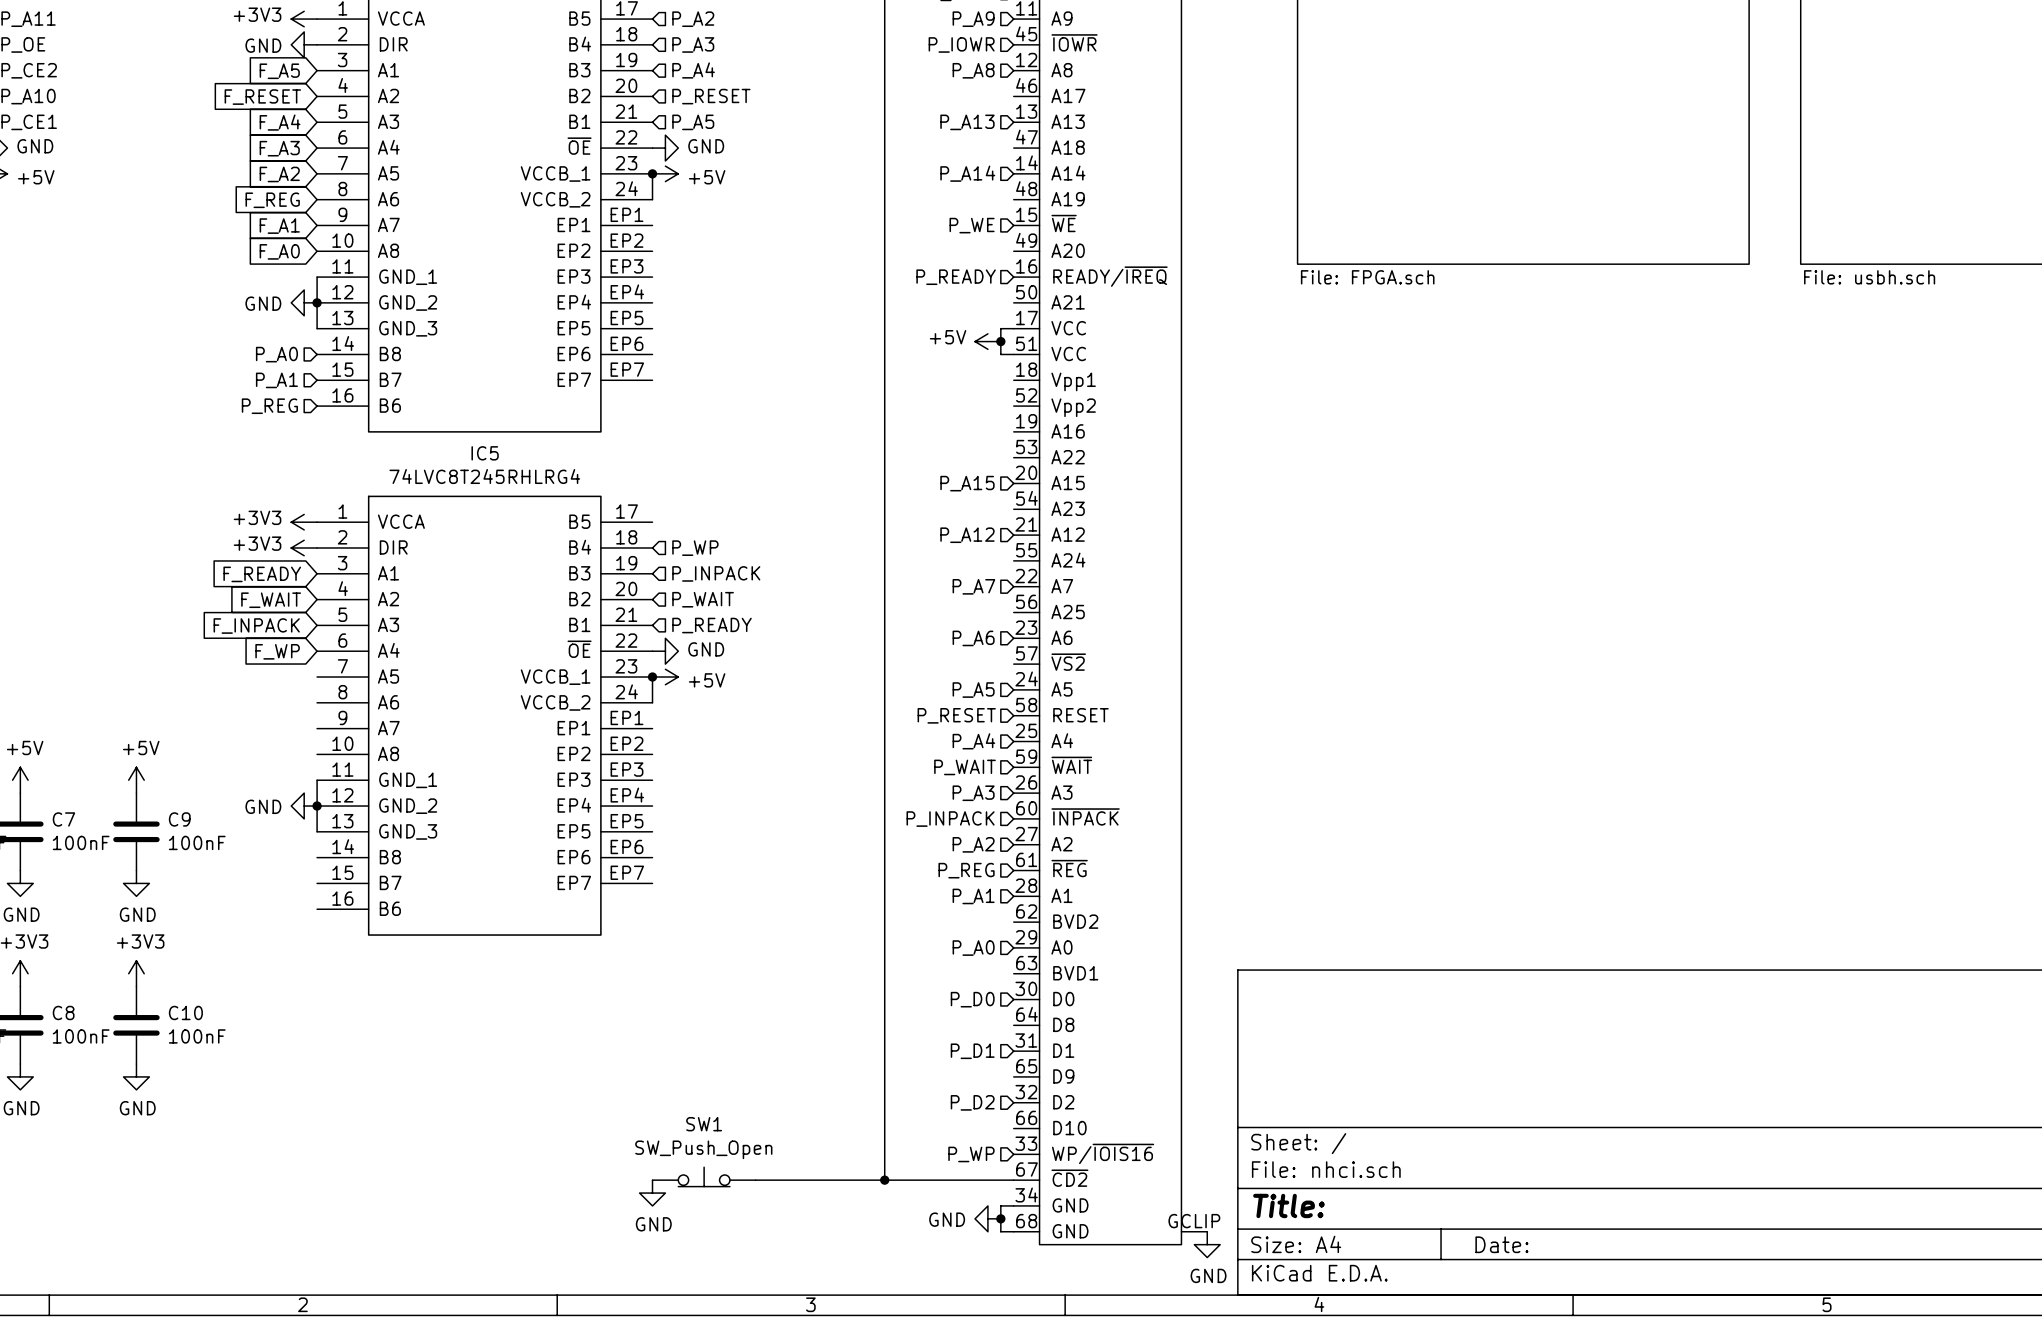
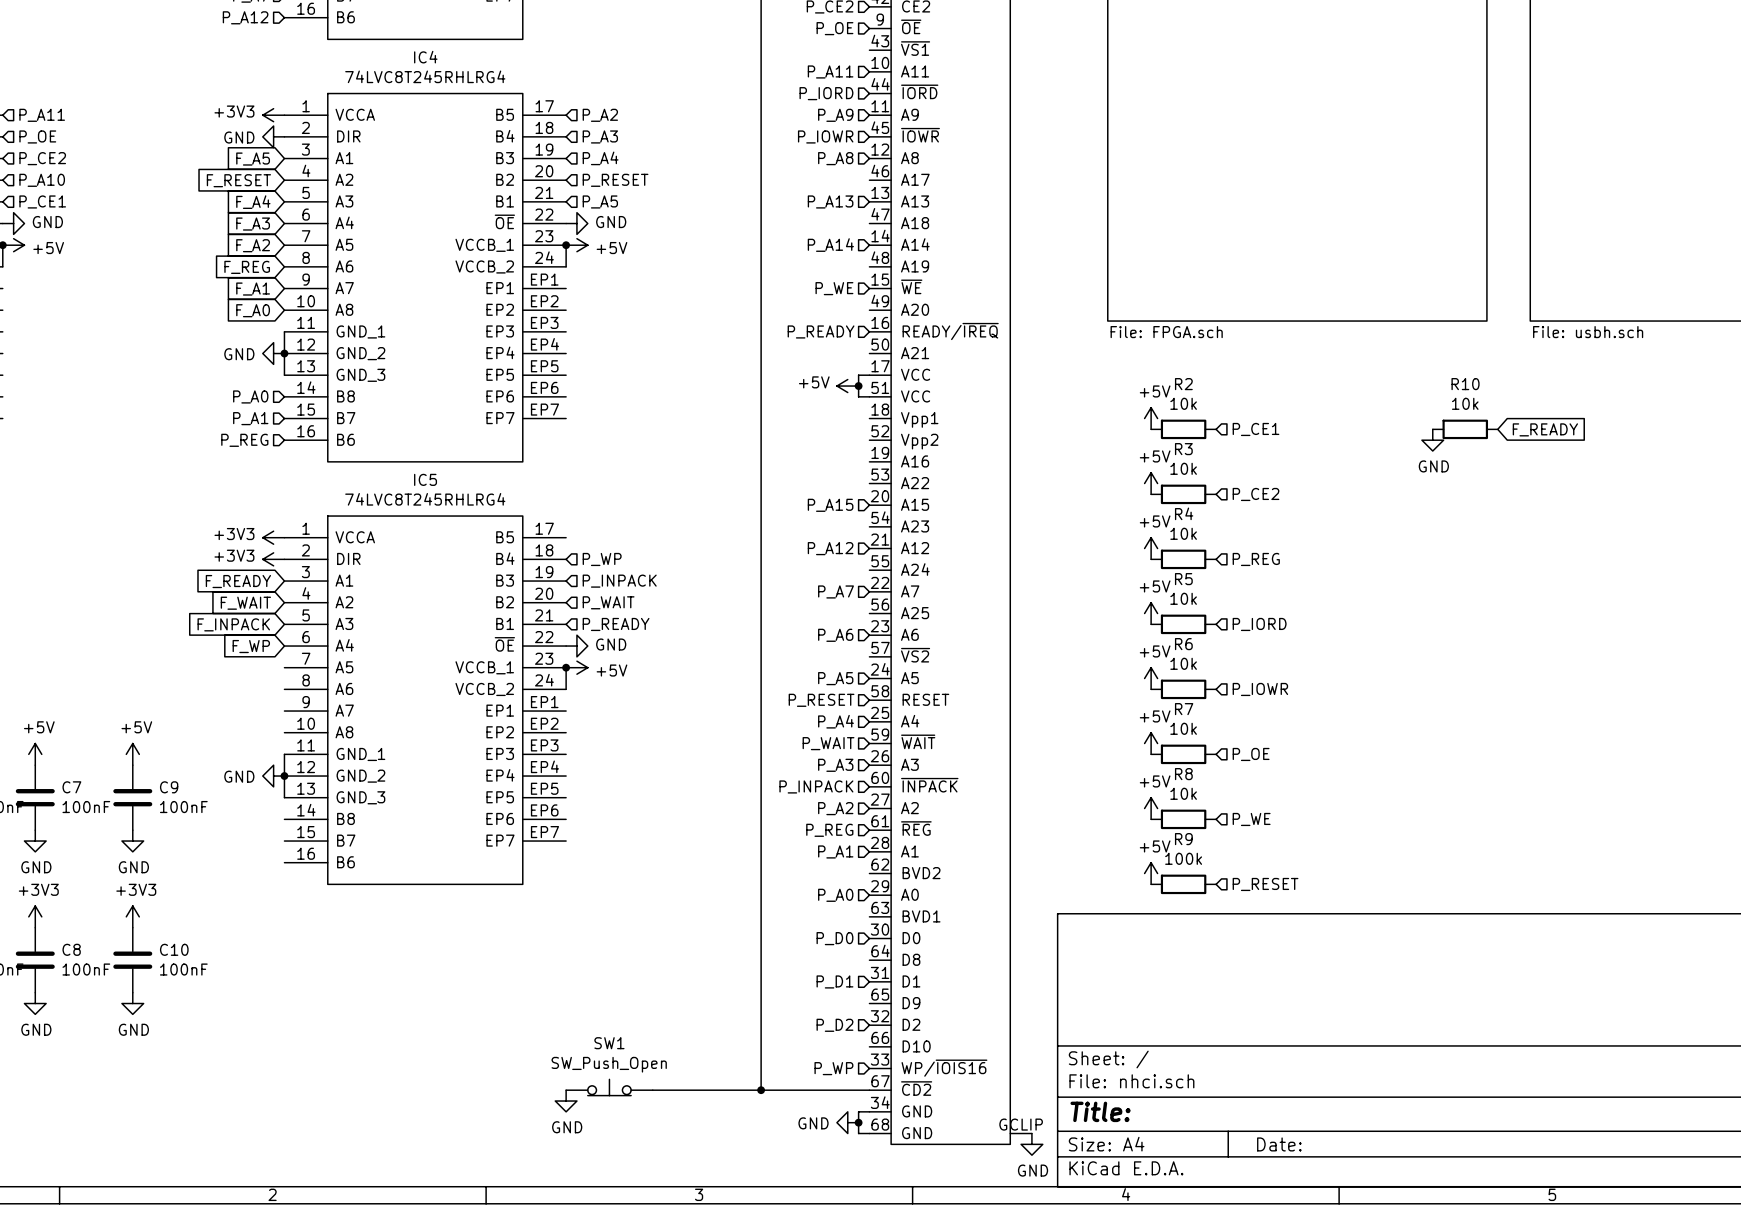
power symbol: none -> +5V (1151, 418)
R2: none -> 10k (1183, 429)
hierarchical label: none -> P_CE1 (1255, 429)
R10: none -> 10k (1465, 429)
global label: none -> F_READY (1545, 429)
power symbol: none -> GND (1432, 440)
power symbol: none -> +5V (1151, 483)
R3: none -> 10k (1183, 494)
hierarchical label: none -> P_CE2 (1255, 494)
power symbol: none -> +5V (1151, 548)
R4: none -> 10k (1183, 559)
hierarchical label: none -> P_REG (1256, 559)
power symbol: none -> +5V (1151, 613)
R5: none -> 10k (1183, 624)
hierarchical label: none -> P_IORD (1259, 624)
power symbol: none -> +5V (1151, 678)
R6: none -> 10k (1183, 689)
hierarchical label: none -> P_IOWR (1260, 689)
power symbol: none -> +5V (1151, 743)
R7: none -> 10k (1183, 754)
hierarchical label: none -> P_OE (1251, 754)
power symbol: none -> +5V (1151, 808)
R8: none -> 10k (1183, 819)
hierarchical label: none -> P_WE (1251, 819)
power symbol: none -> +5V (1151, 873)
R9: none -> 100k (1183, 884)
hierarchical label: none -> P_RESET (1265, 884)

